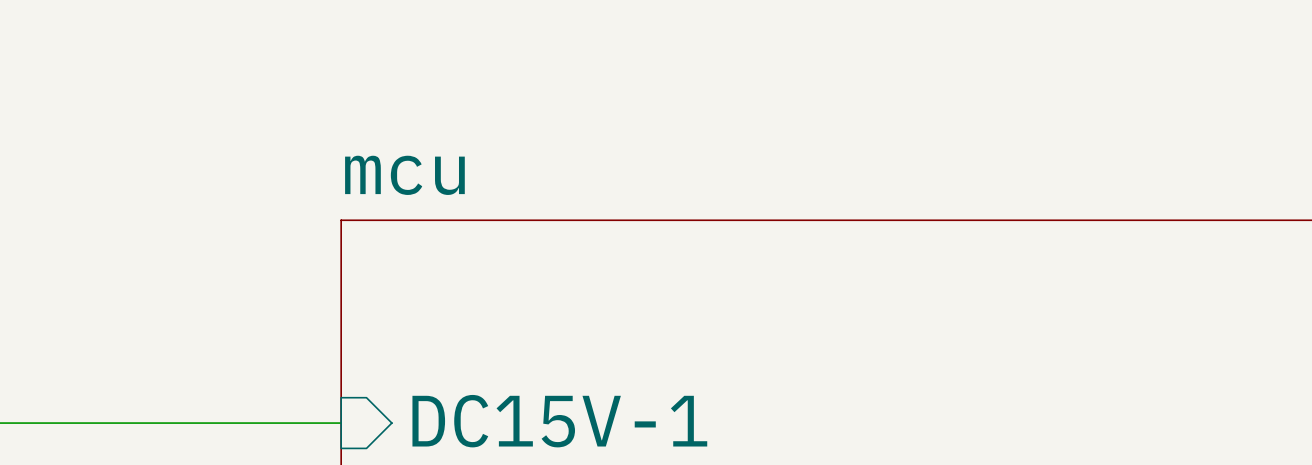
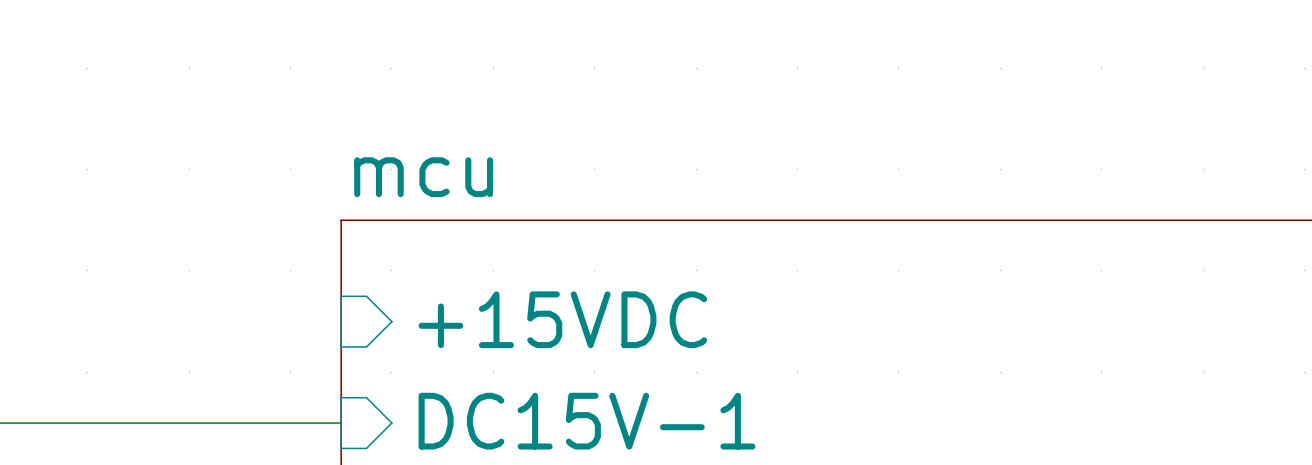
sheet pin: none -> +15VDC (562, 319)

